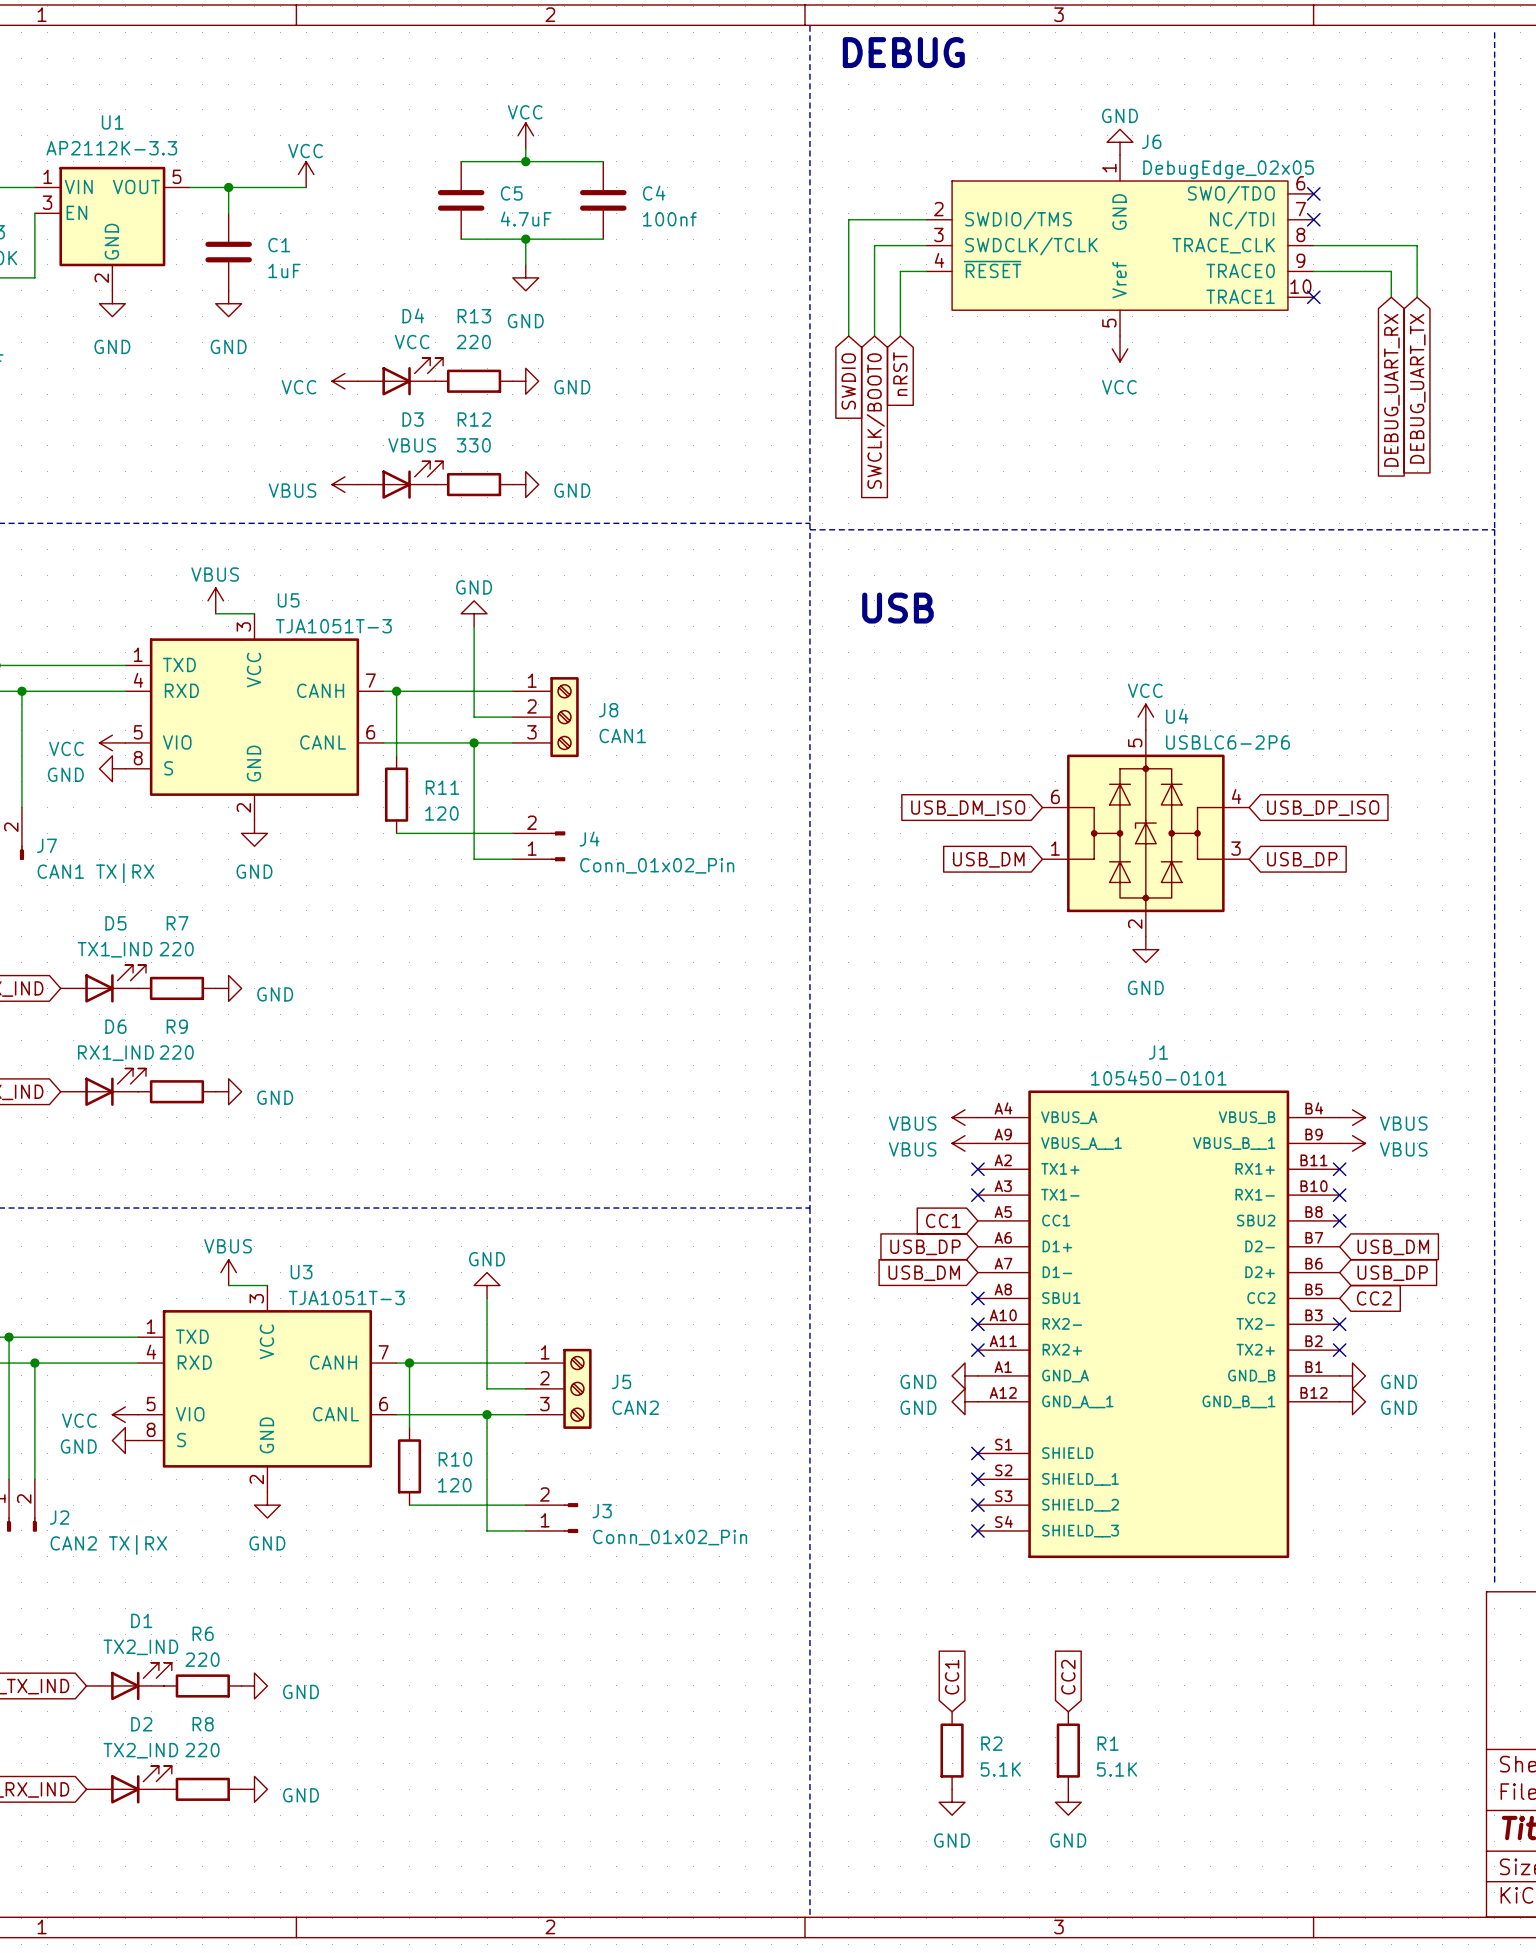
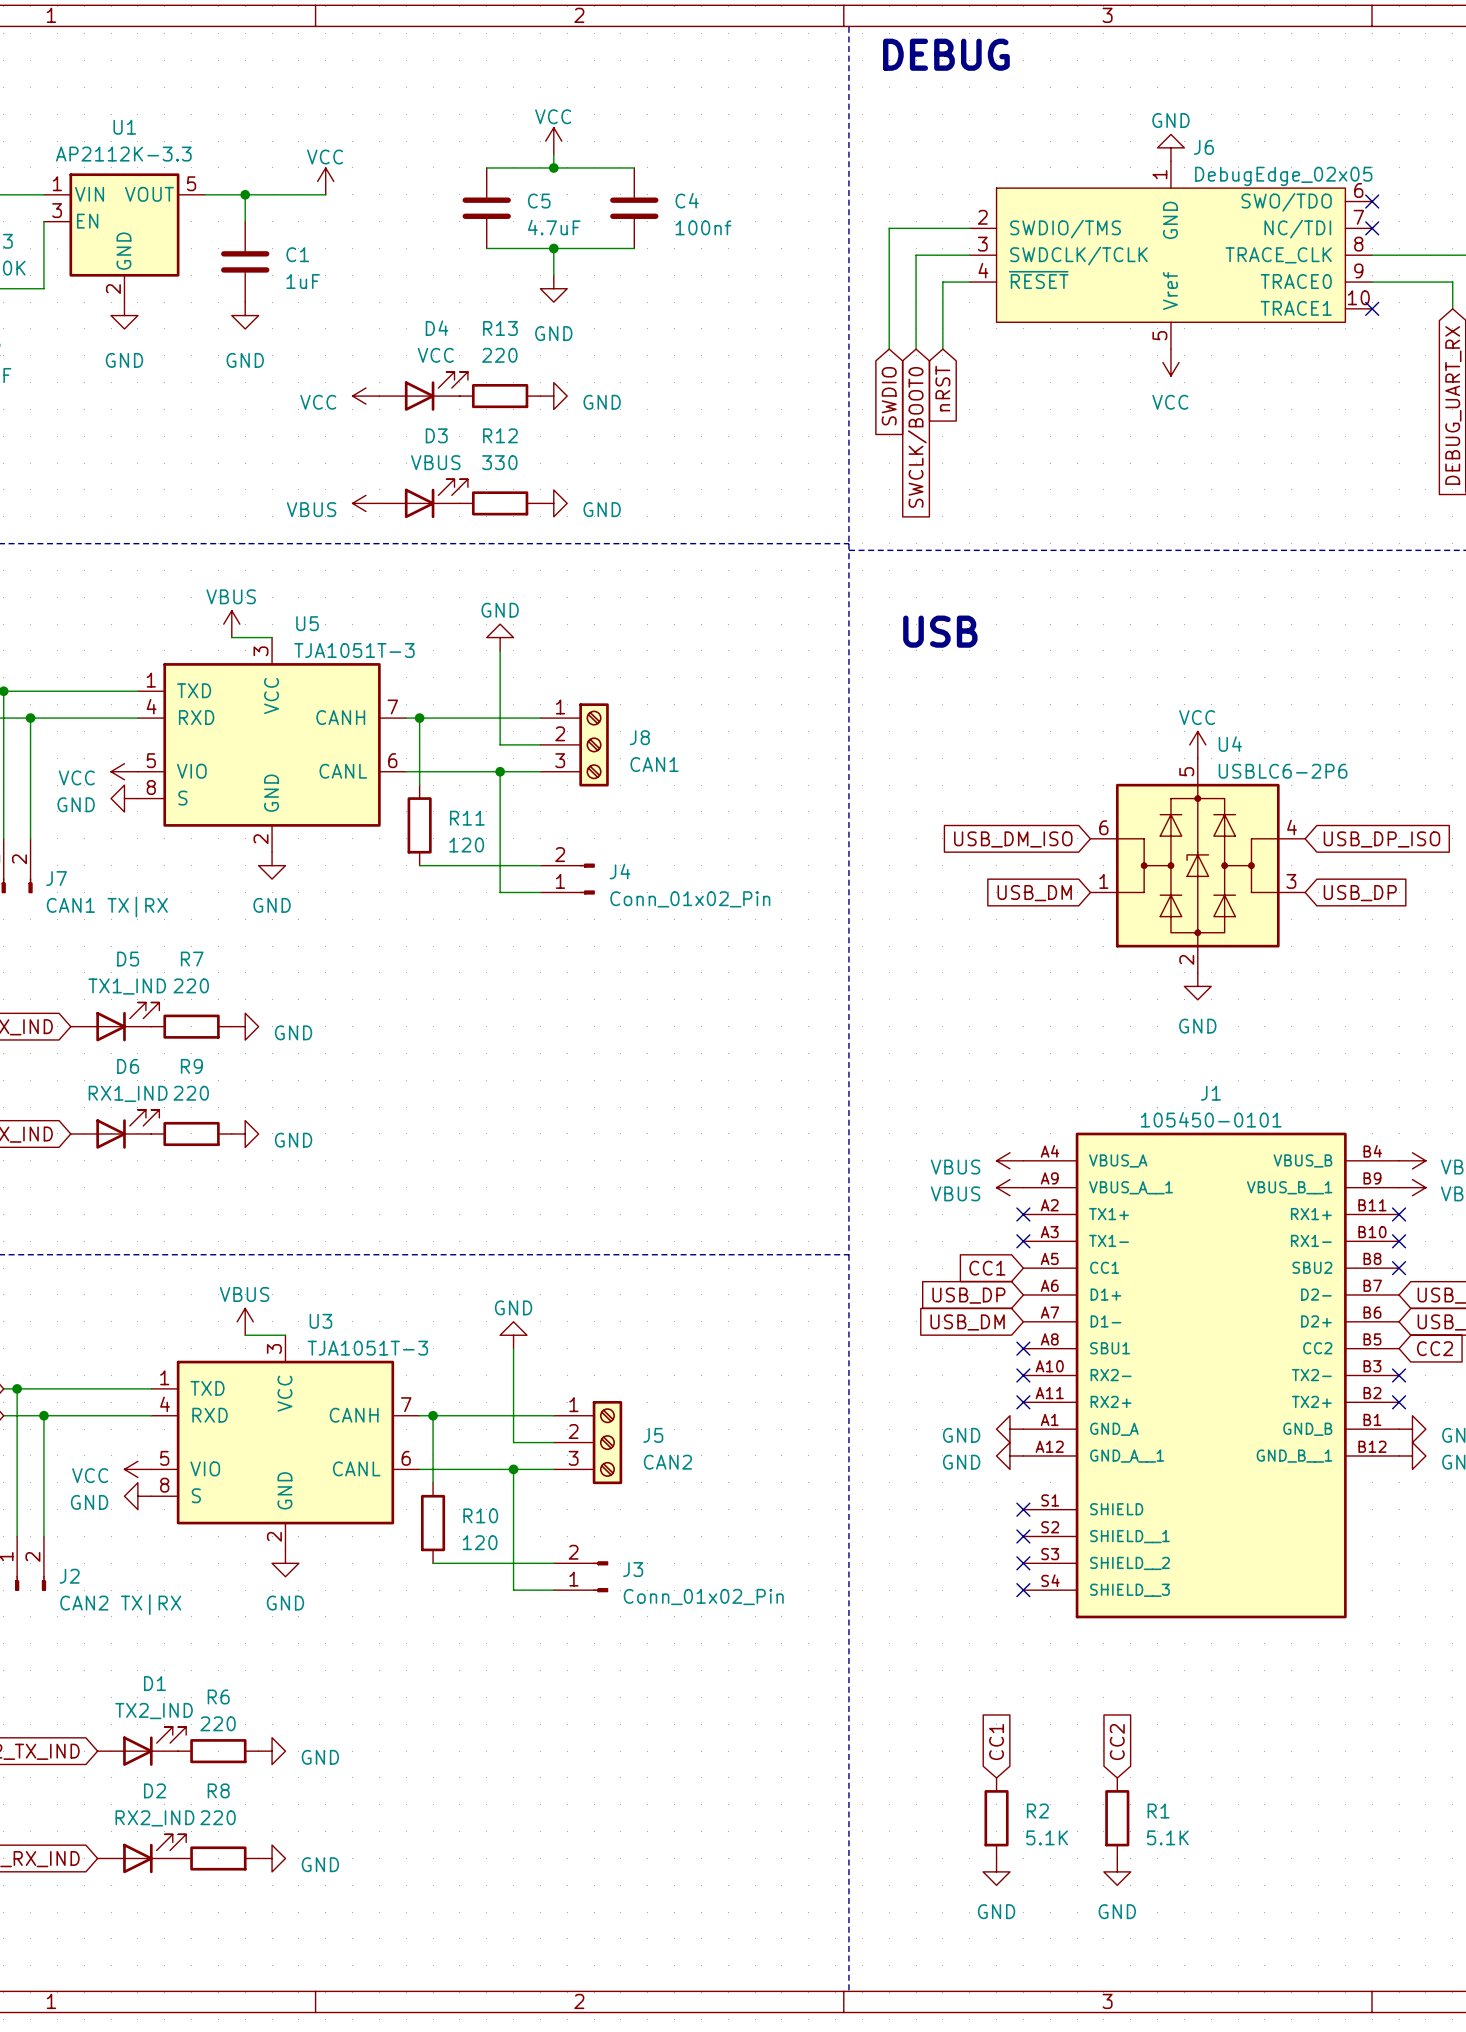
D2 value: TX2_IND (140, 1750) -> RX2_IND (154, 1818)

